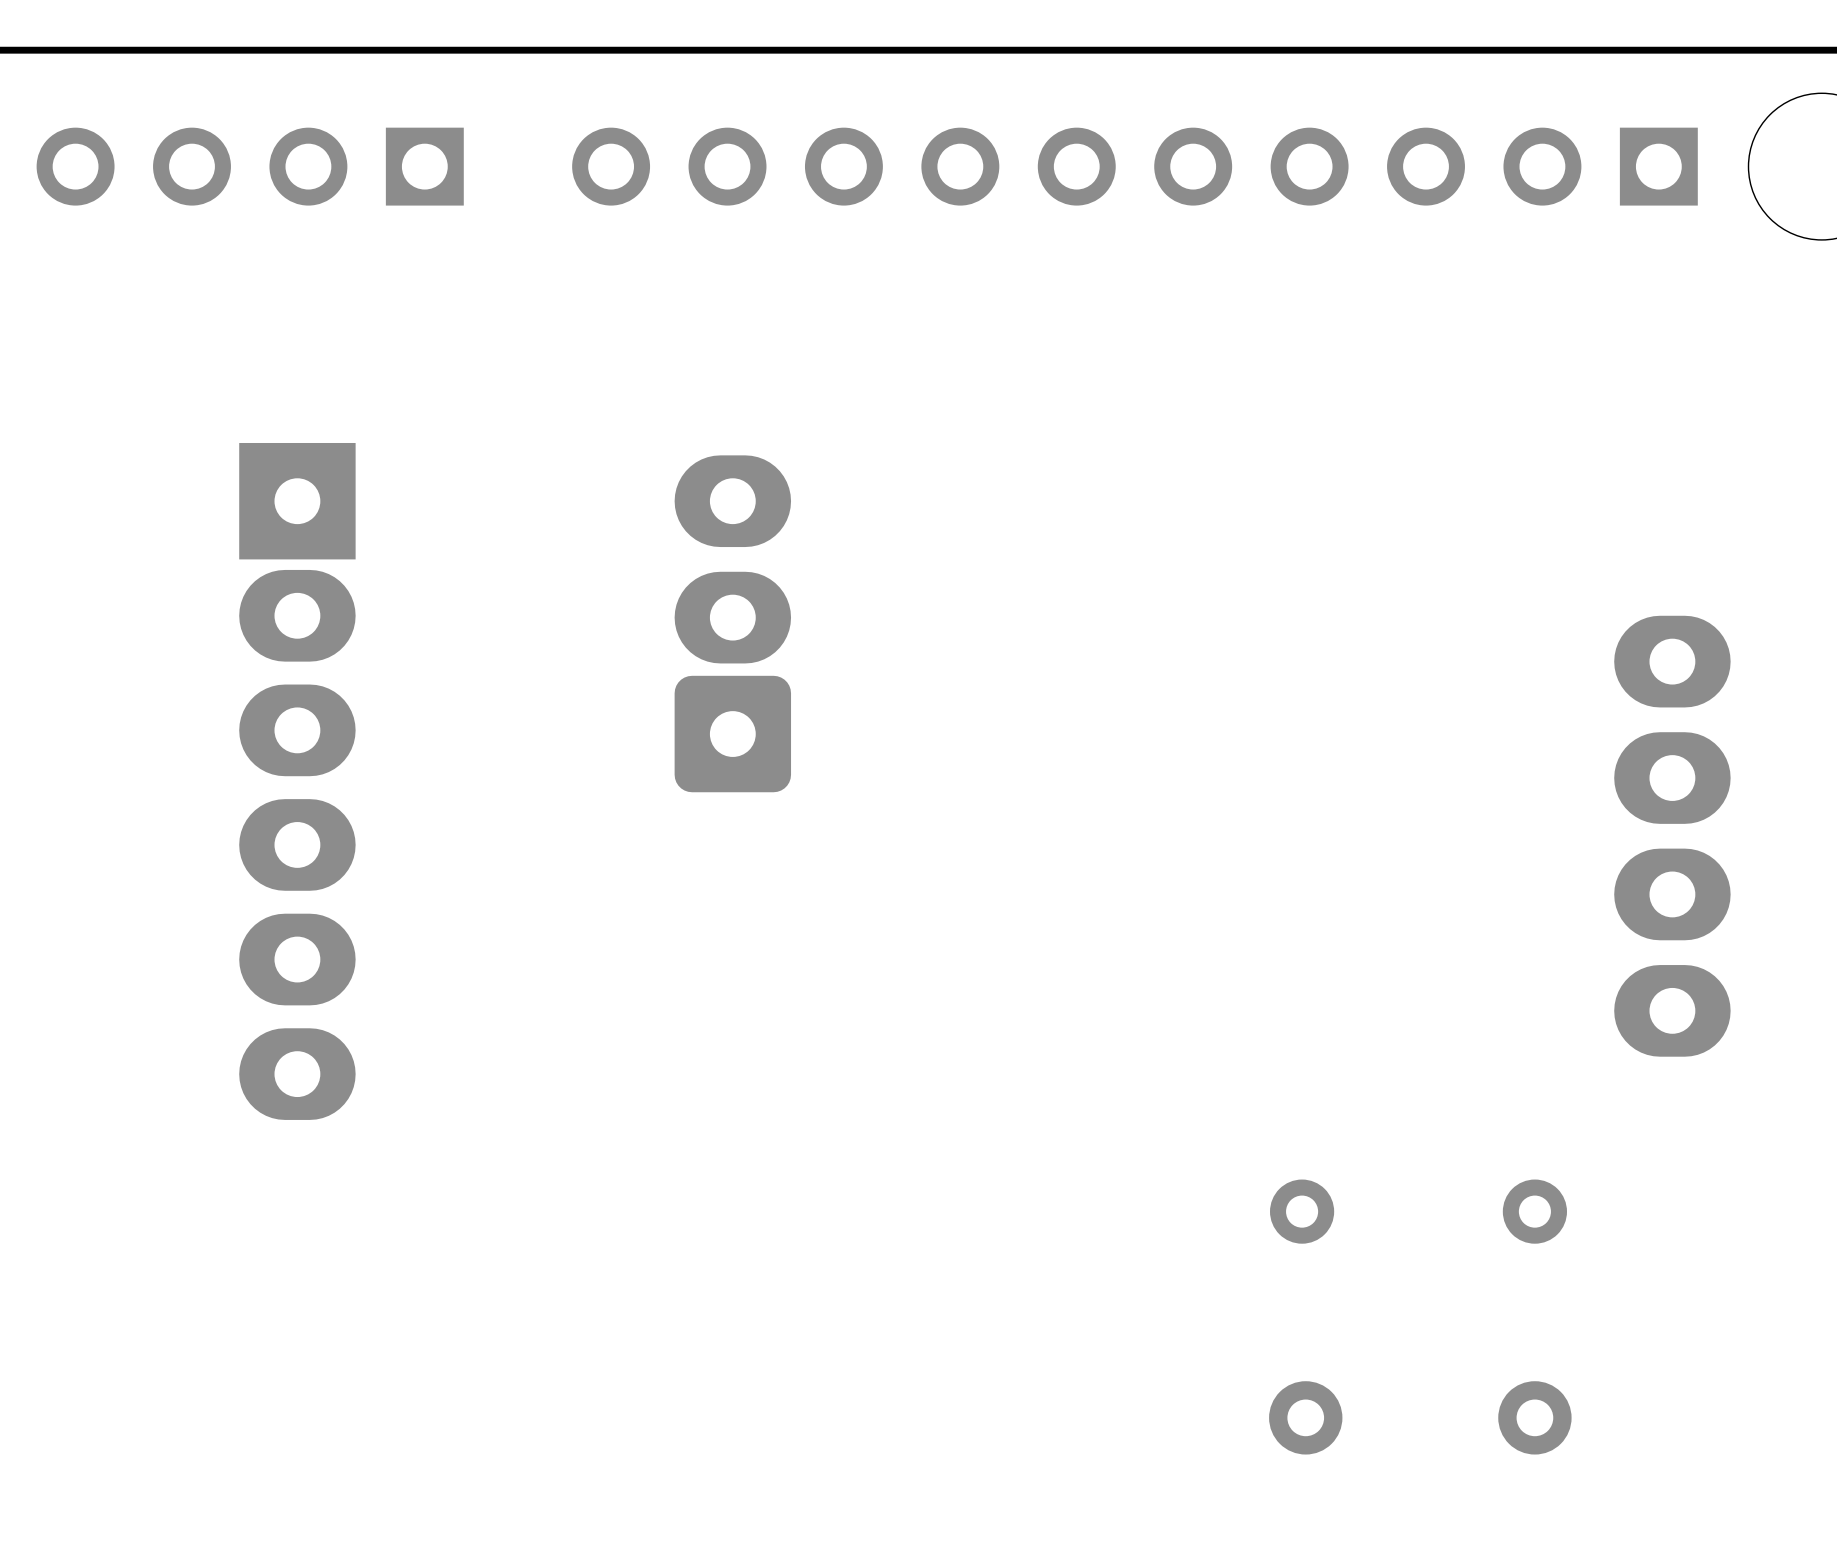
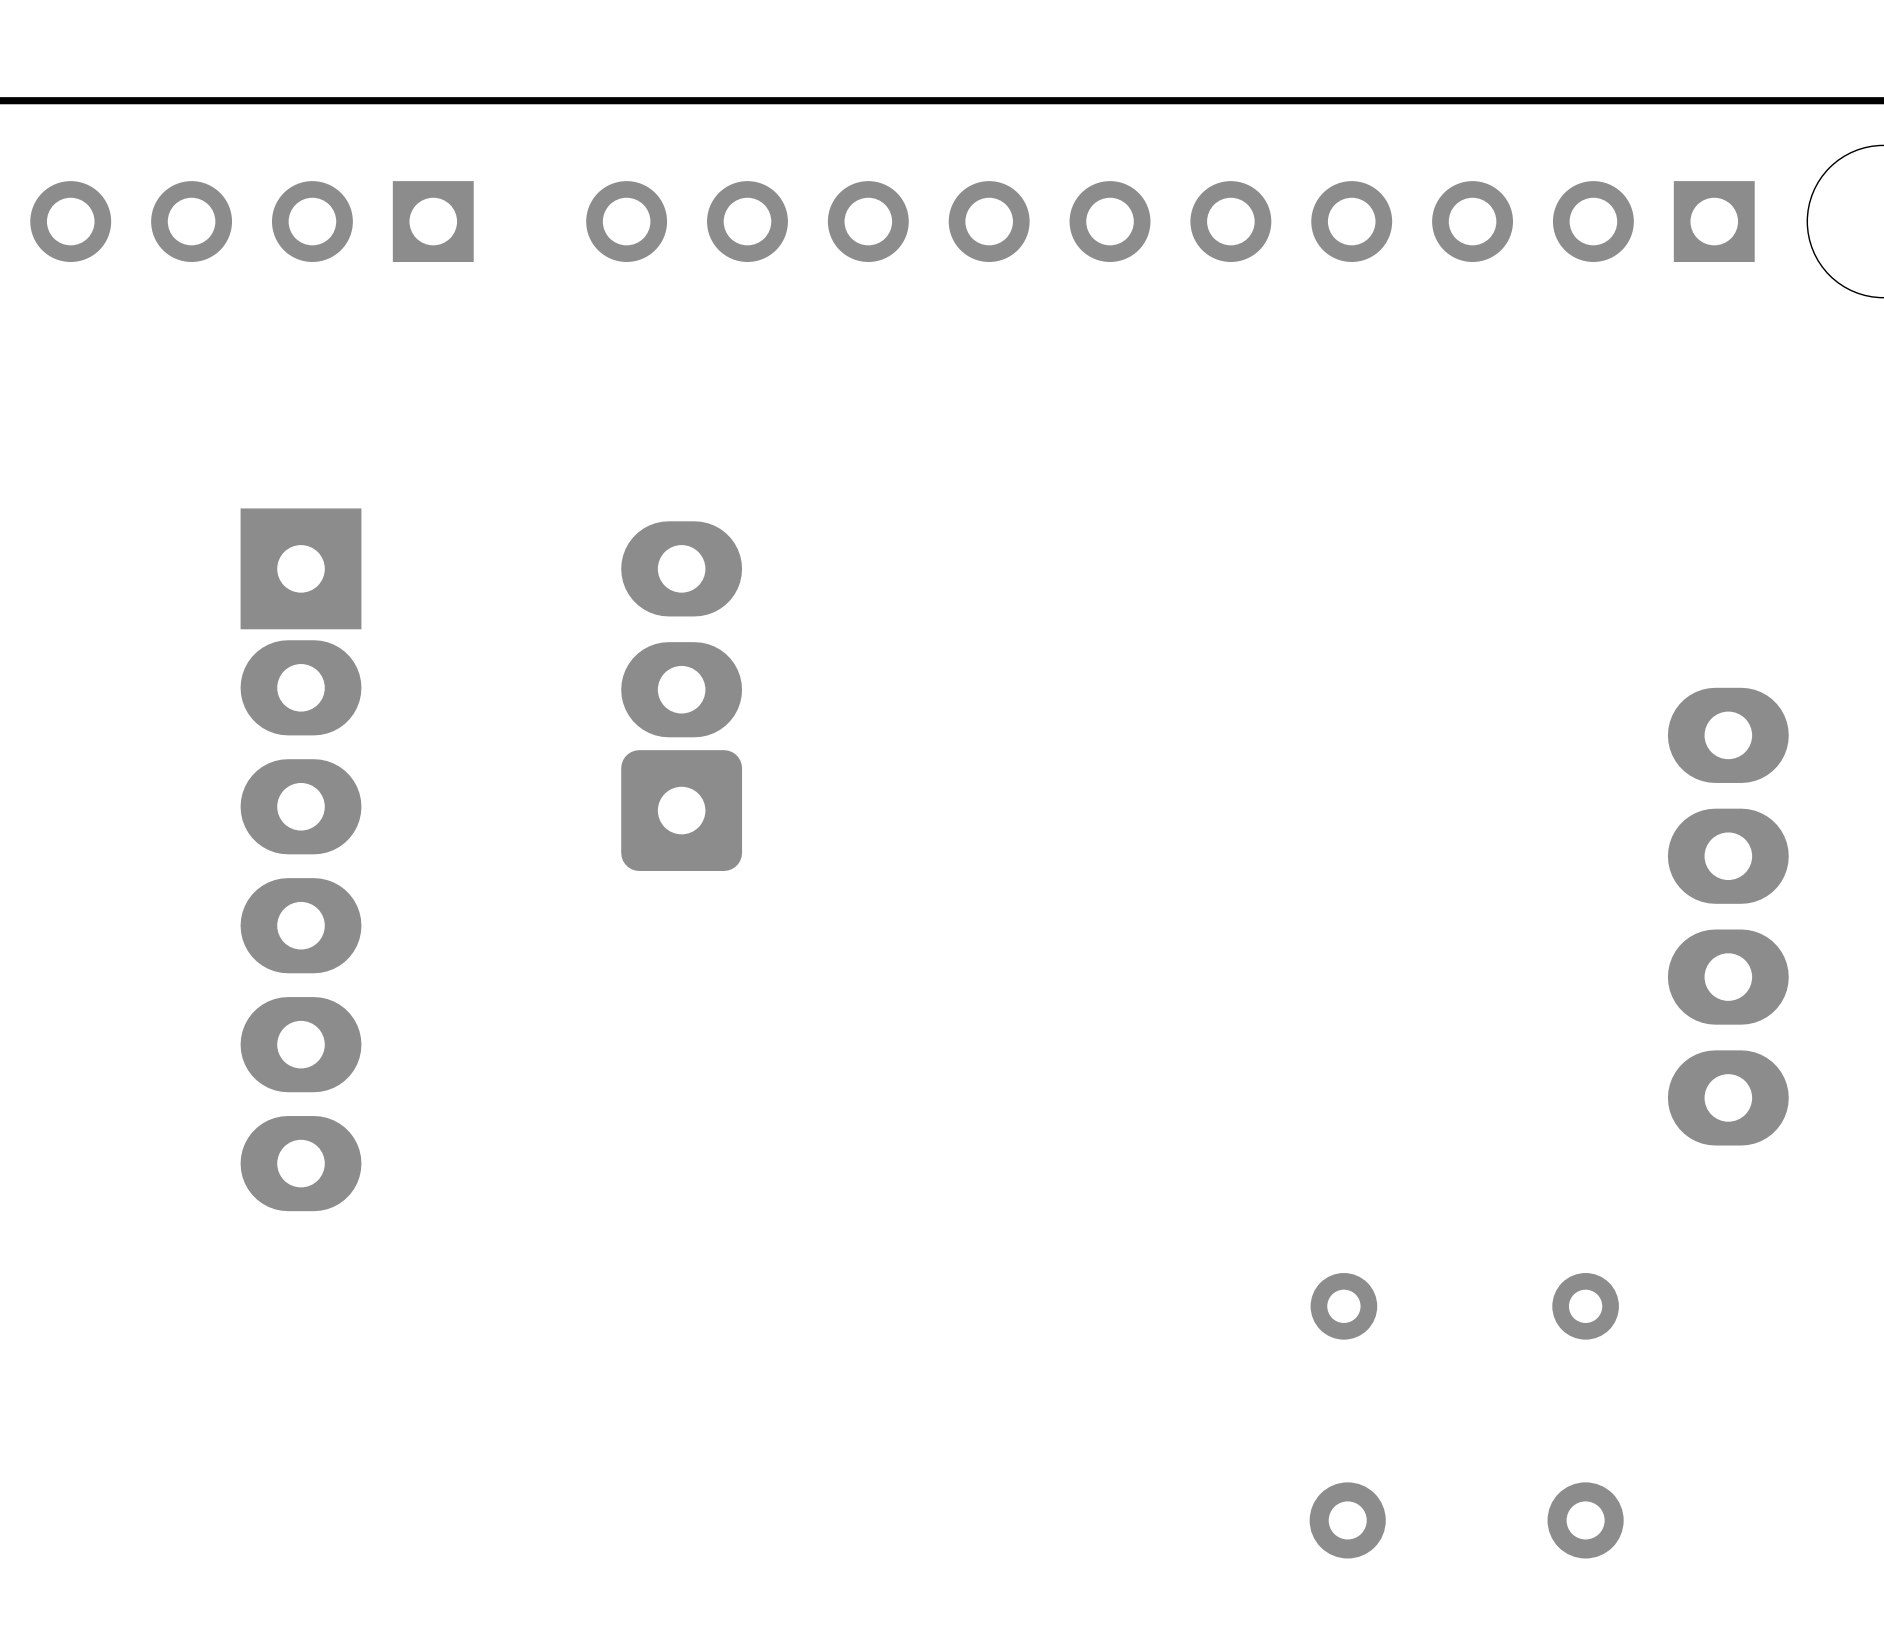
part position: (732, 623) -> (681, 696)

